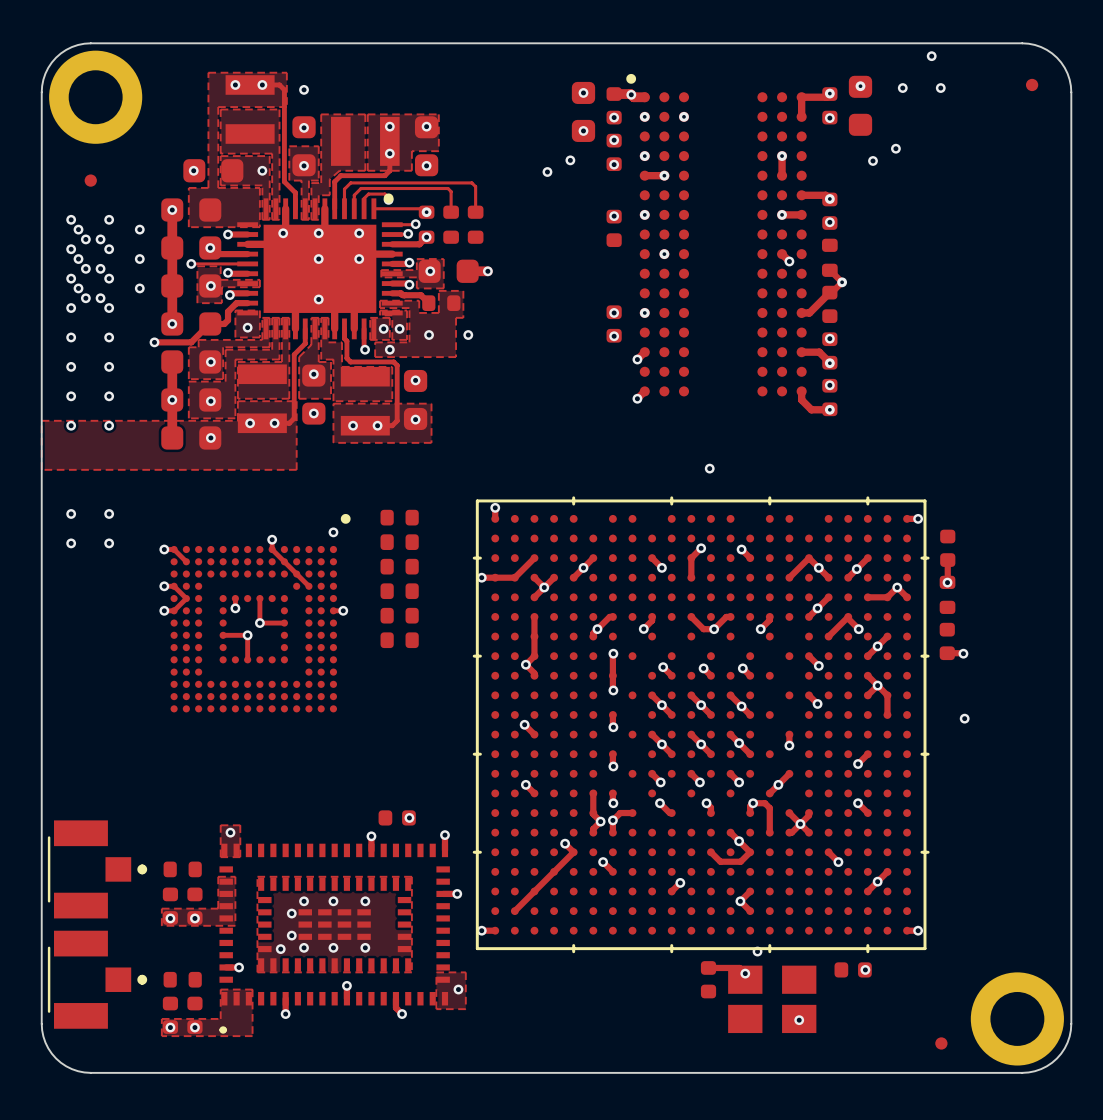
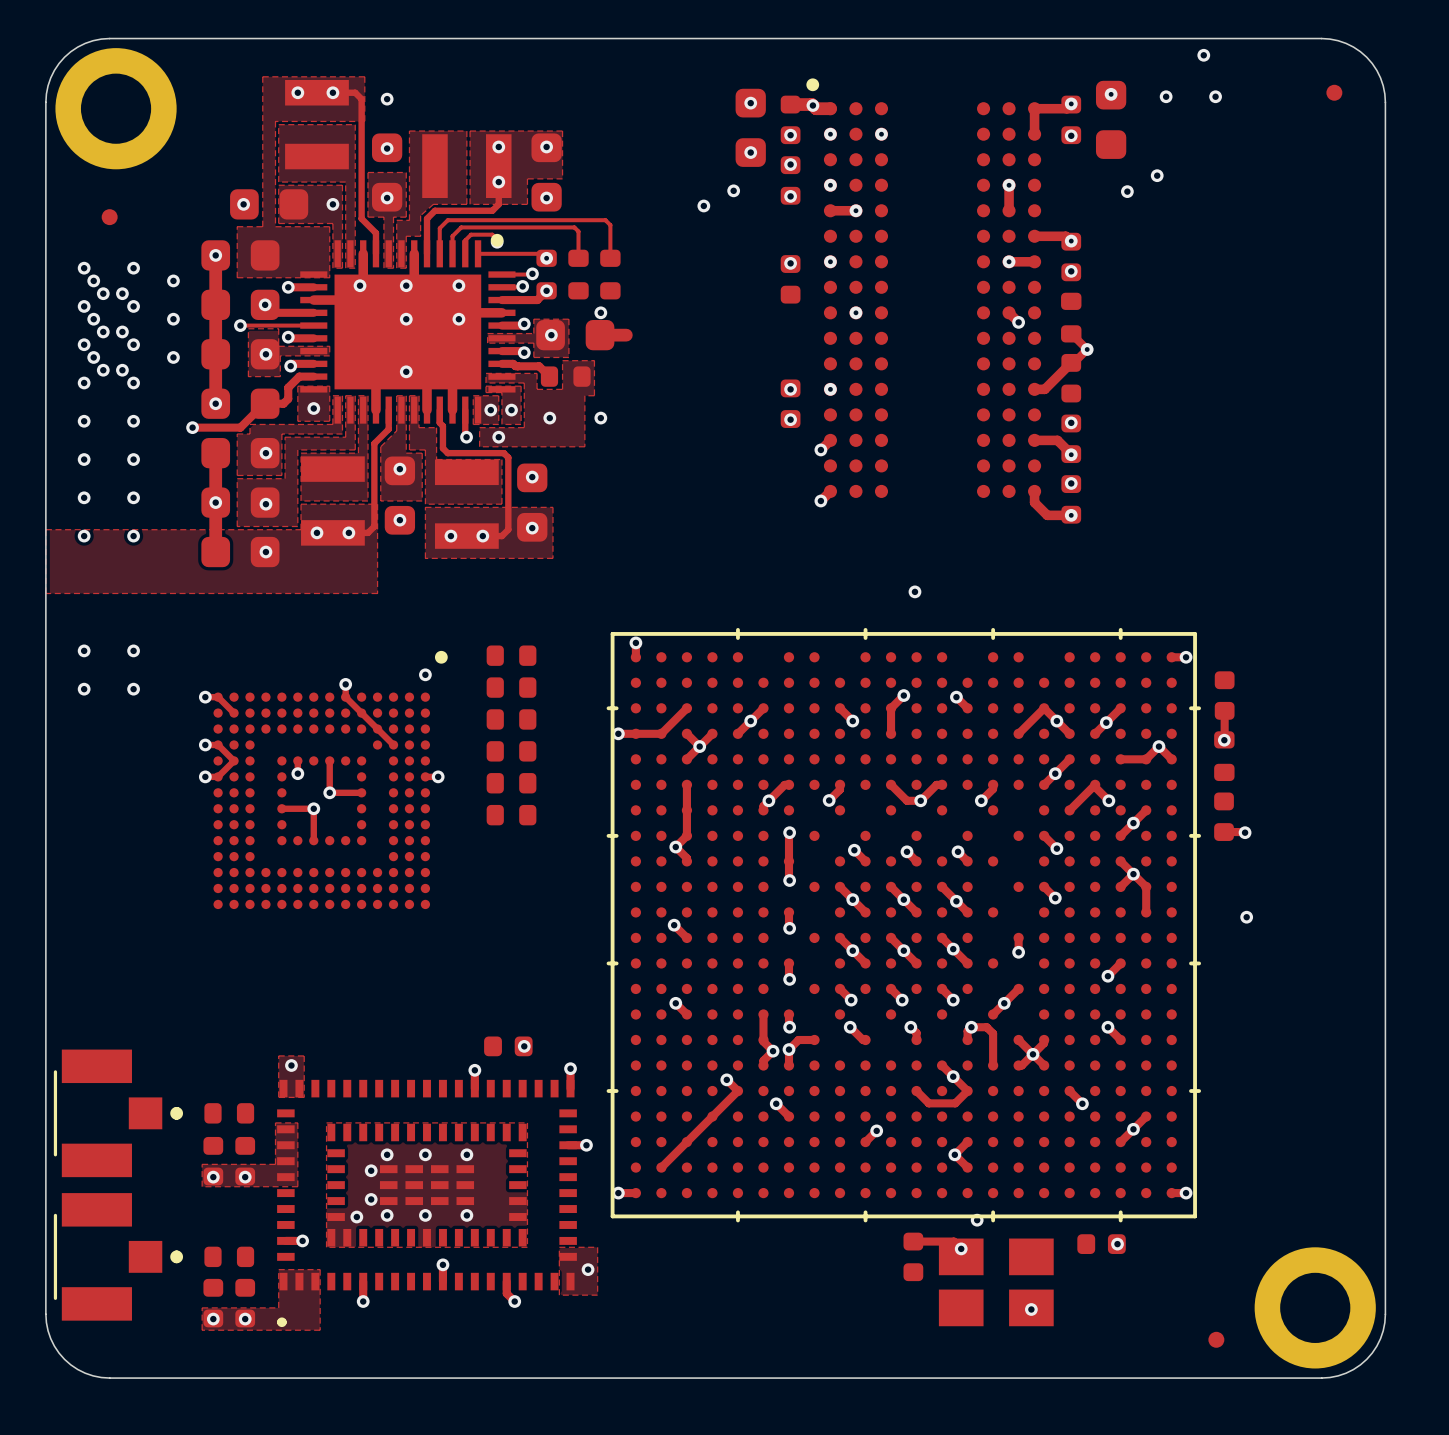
via position: (487, 271) -> (600, 312)

